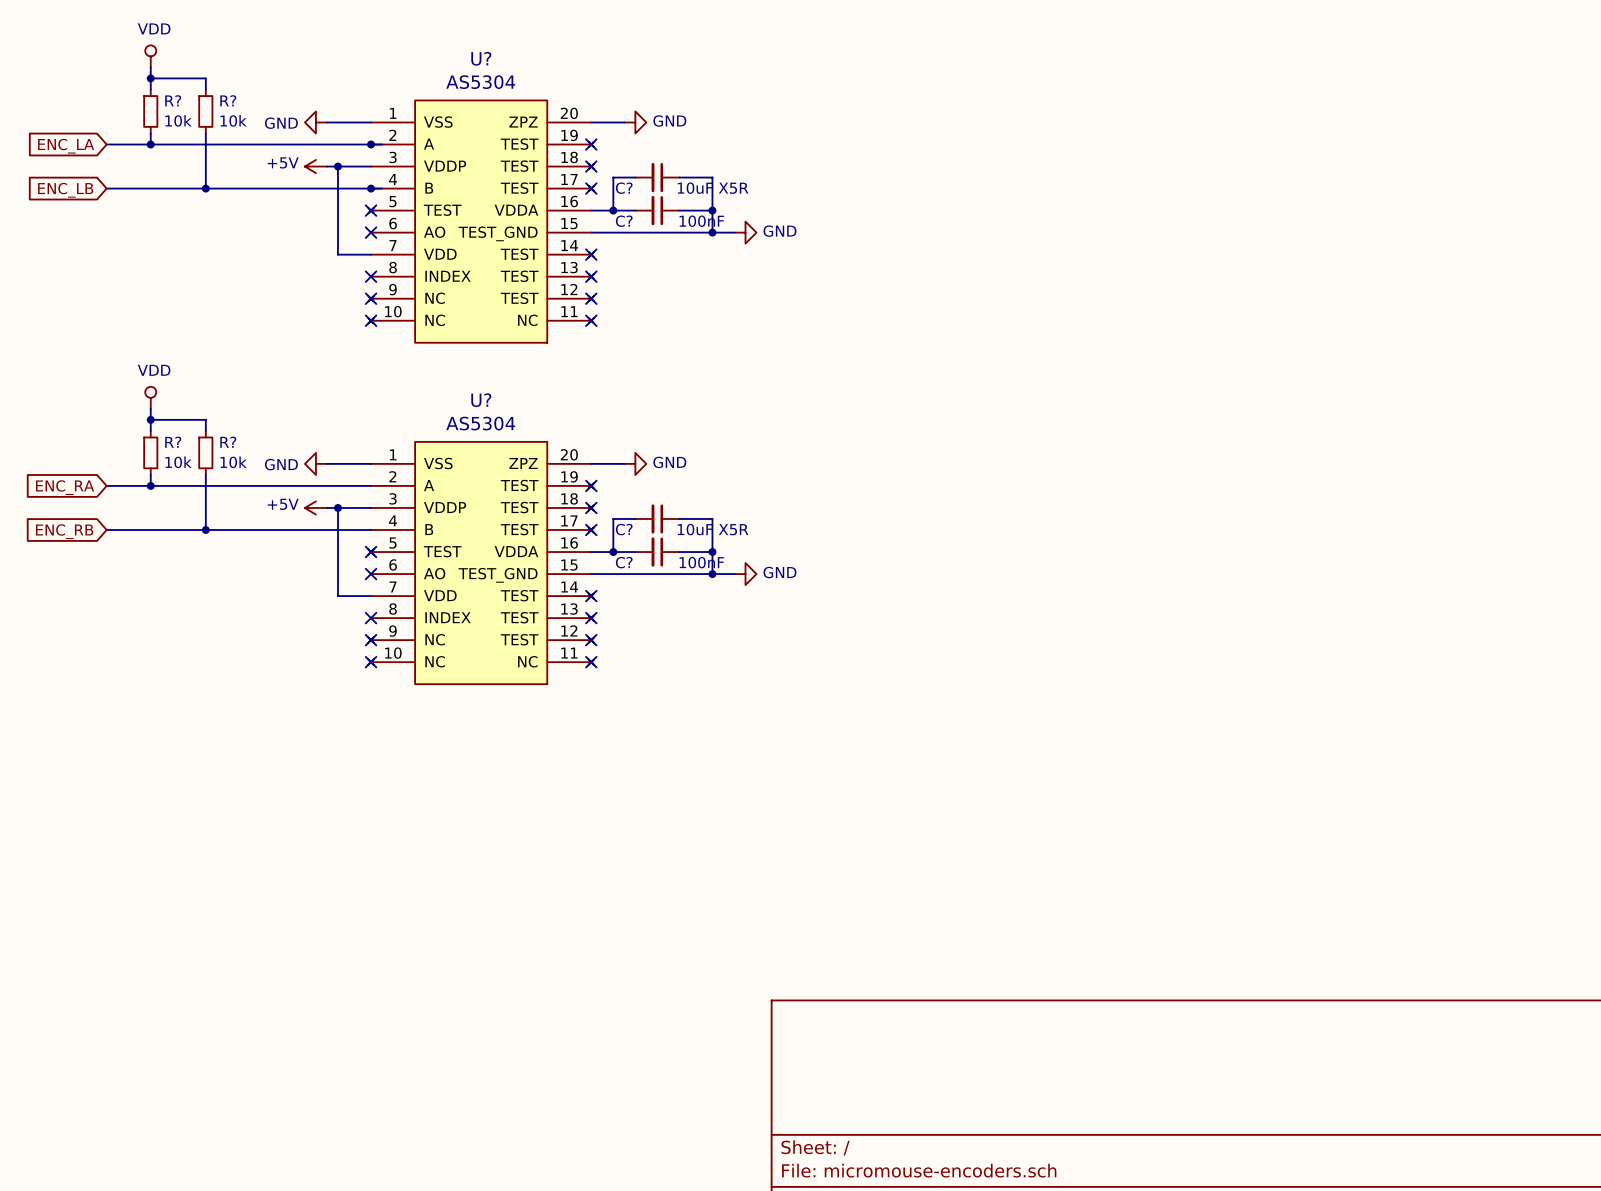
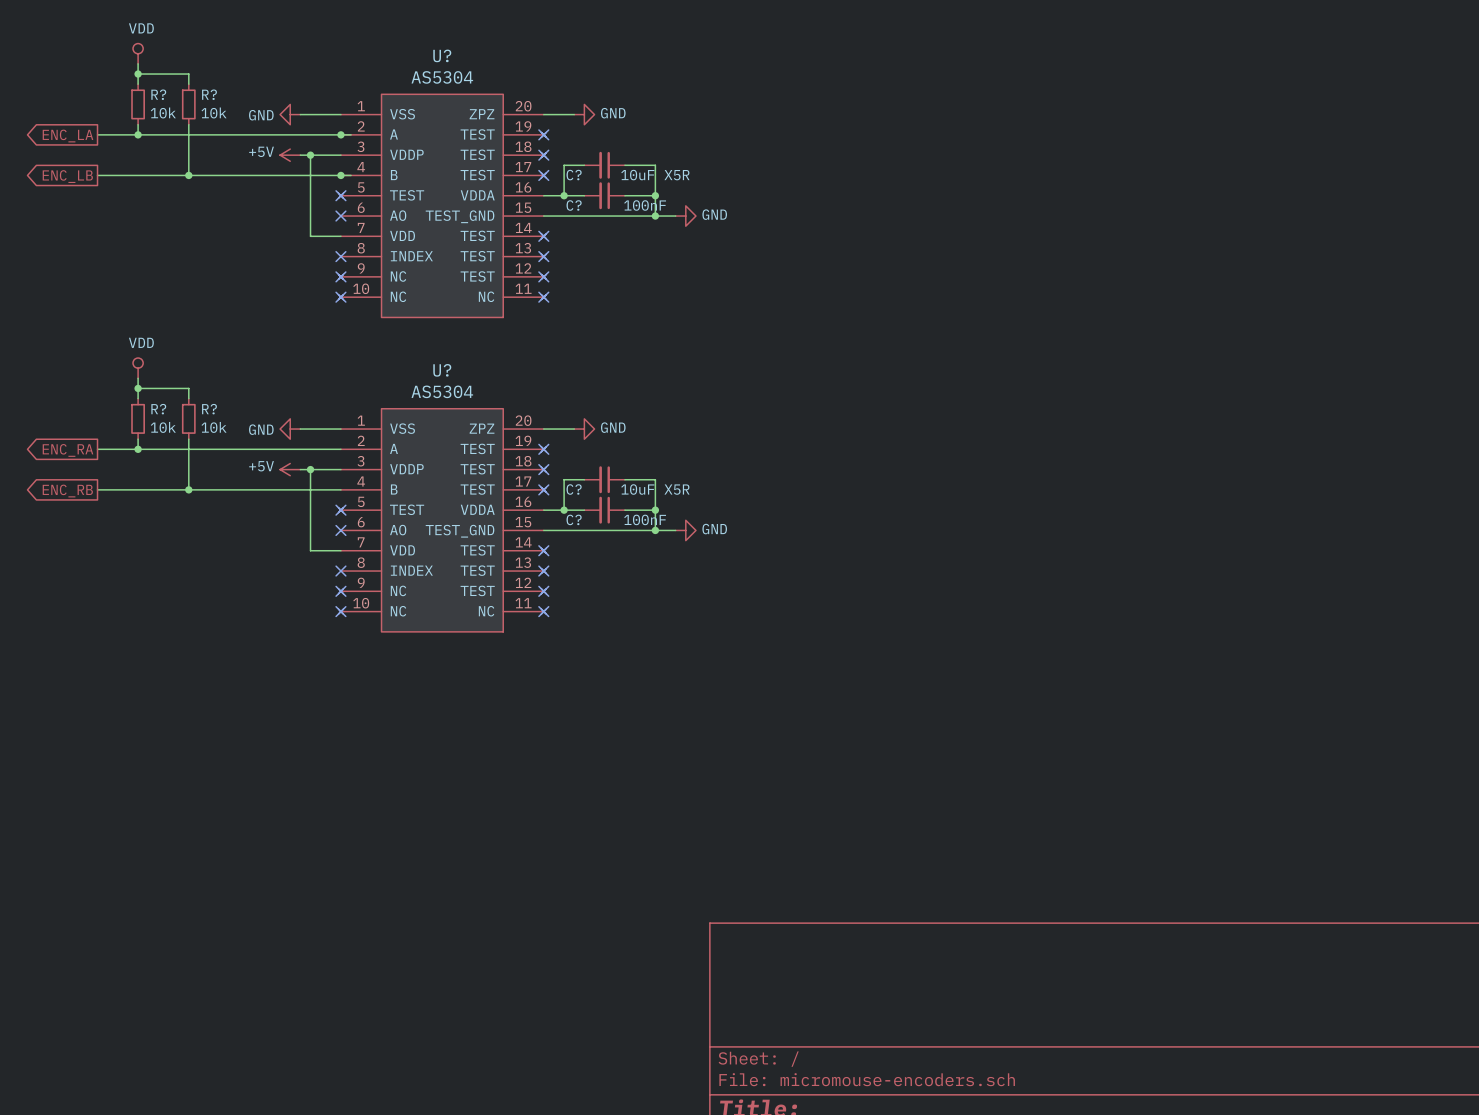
global label shape: input (66, 146) -> output (67, 136)
global label shape: input (65, 190) -> output (67, 176)
global label shape: input (65, 487) -> output (67, 450)
global label shape: input (64, 531) -> output (67, 491)

